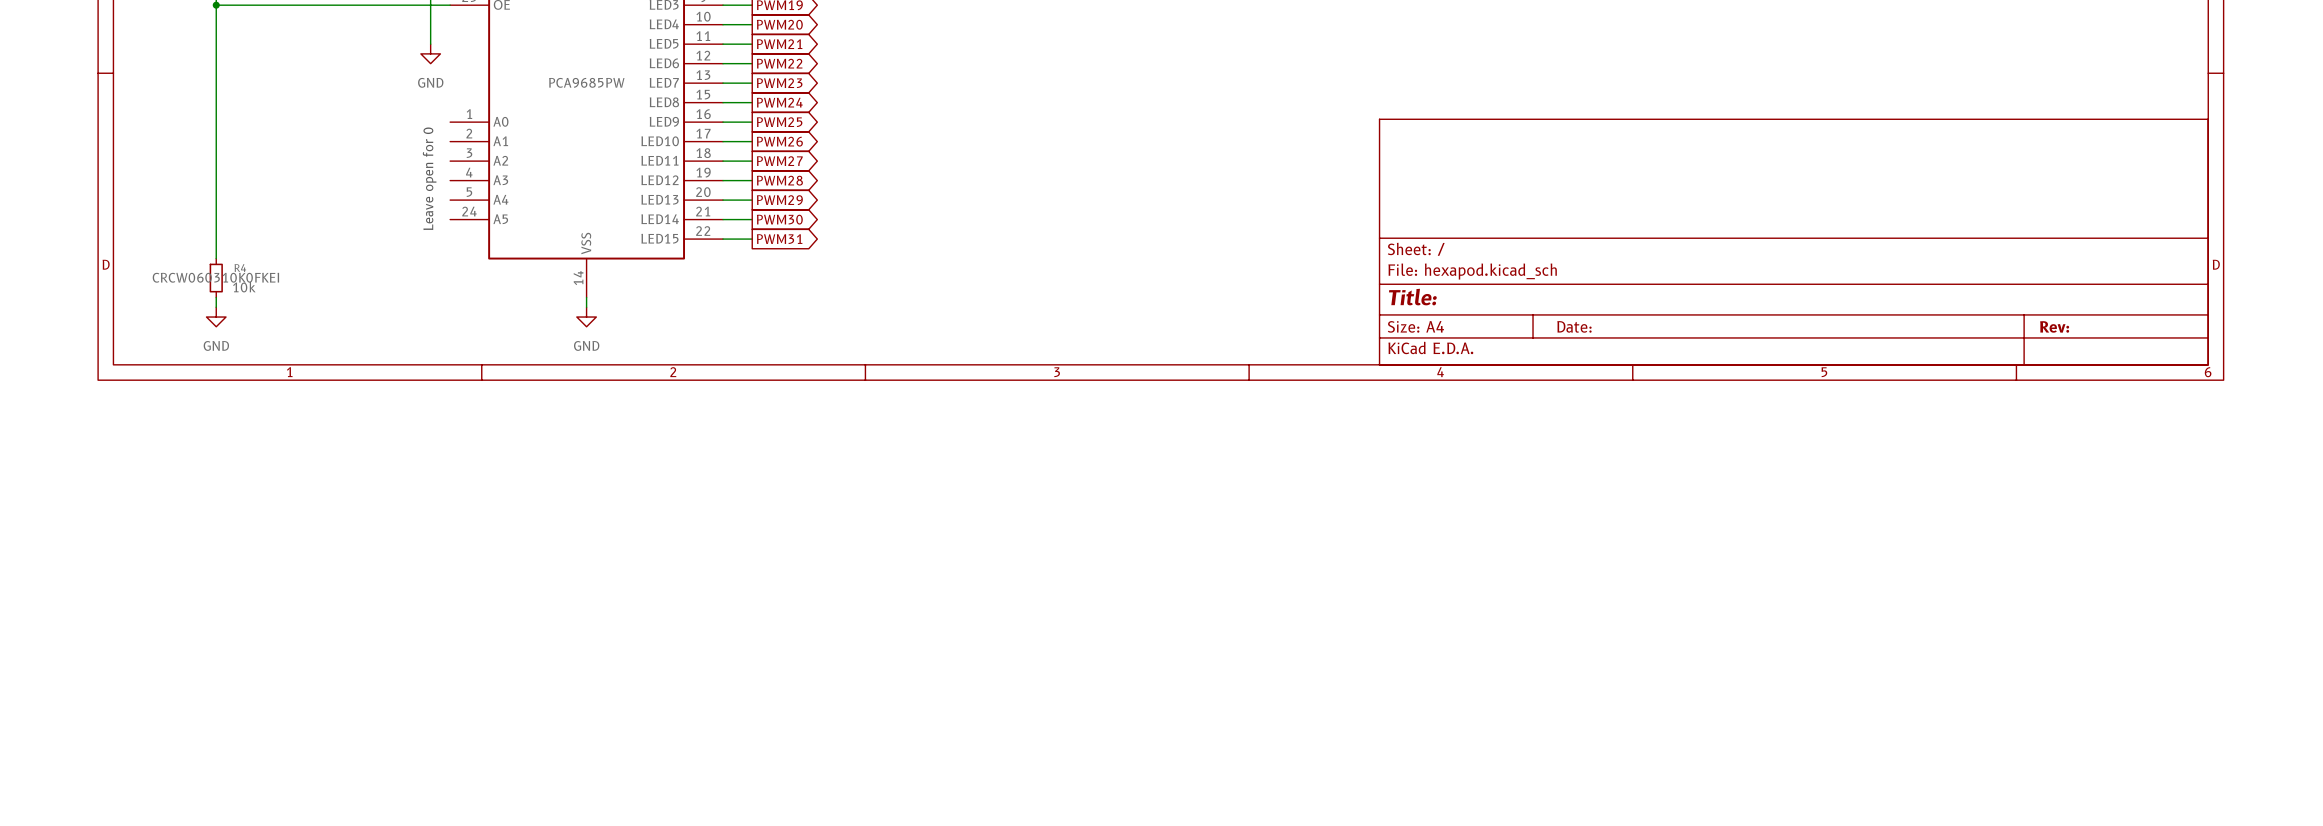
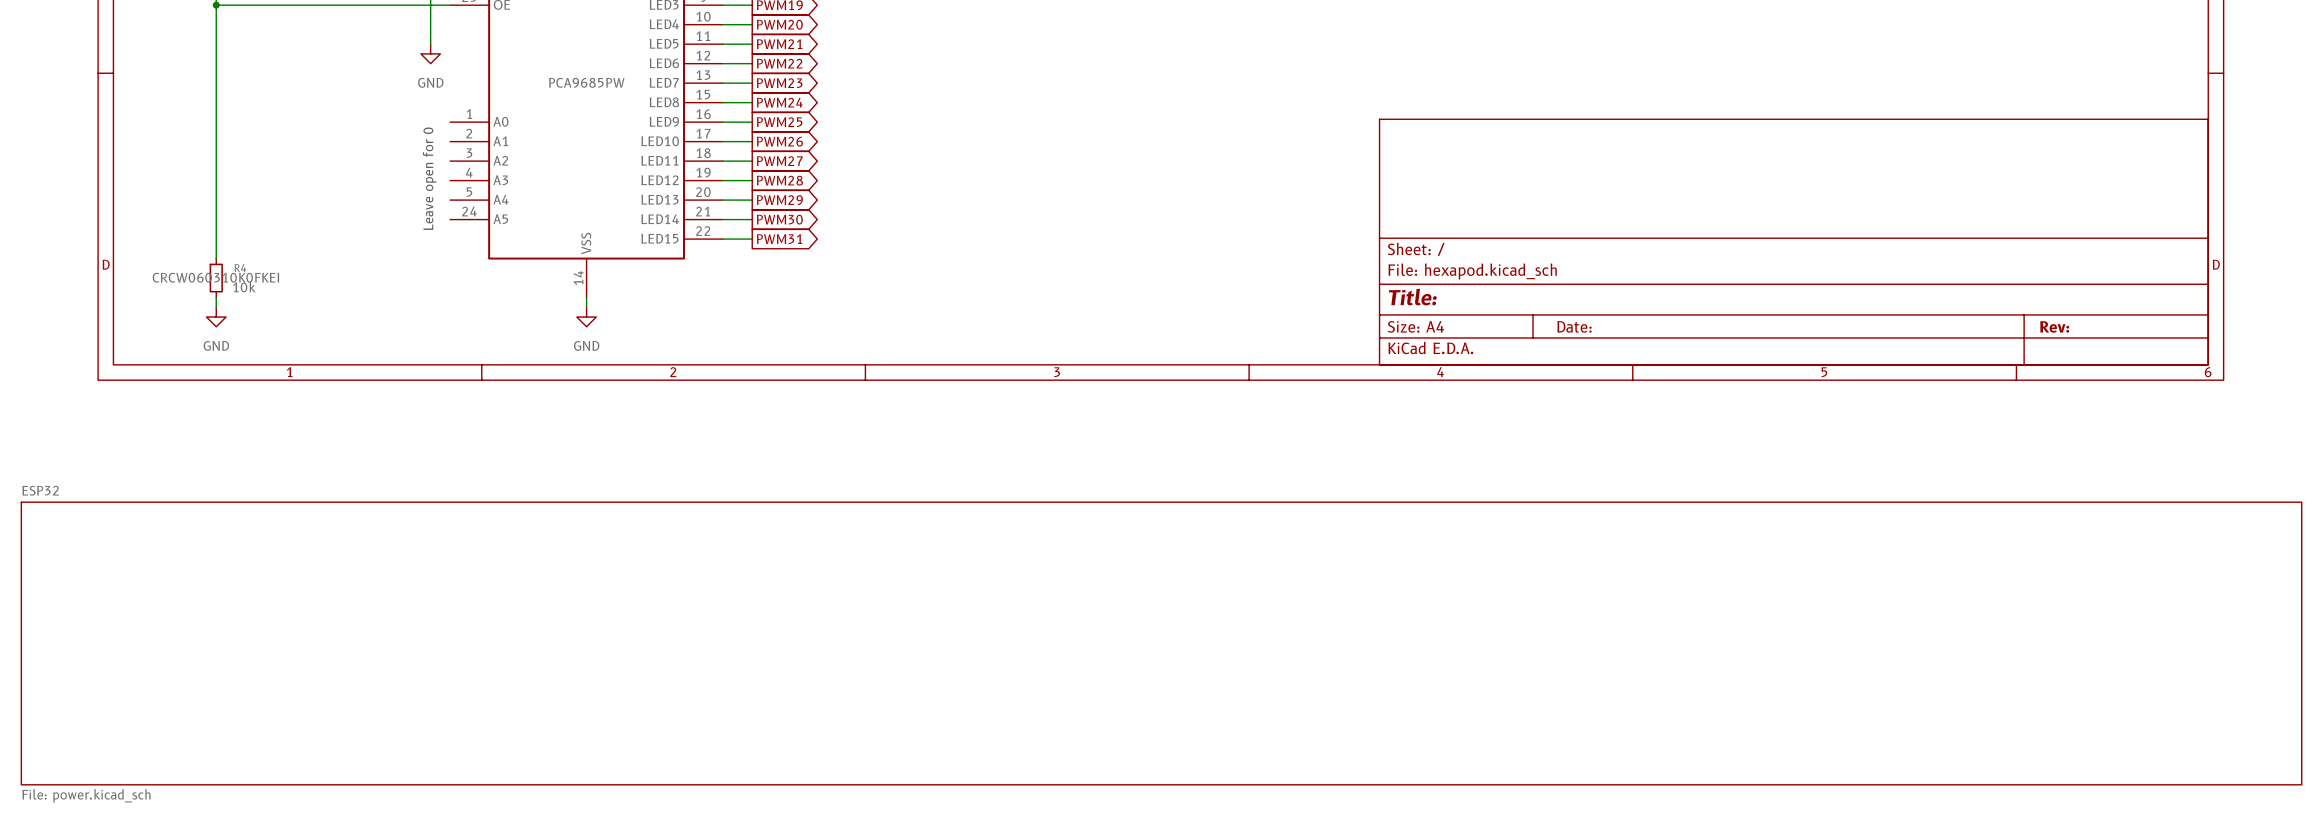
sheet ESP32: none -> File: power.kicad_sch (1161, 643)

